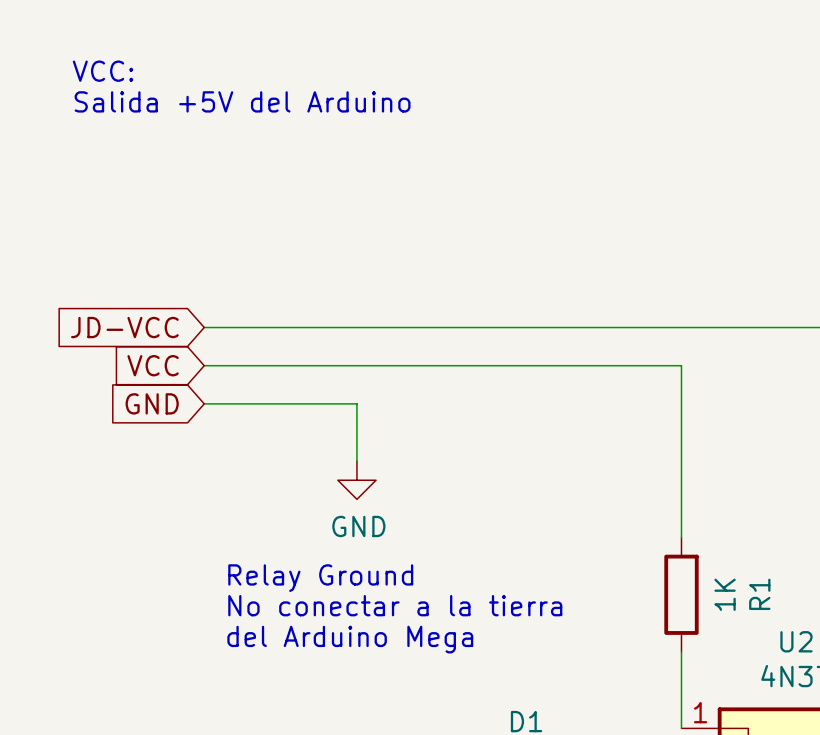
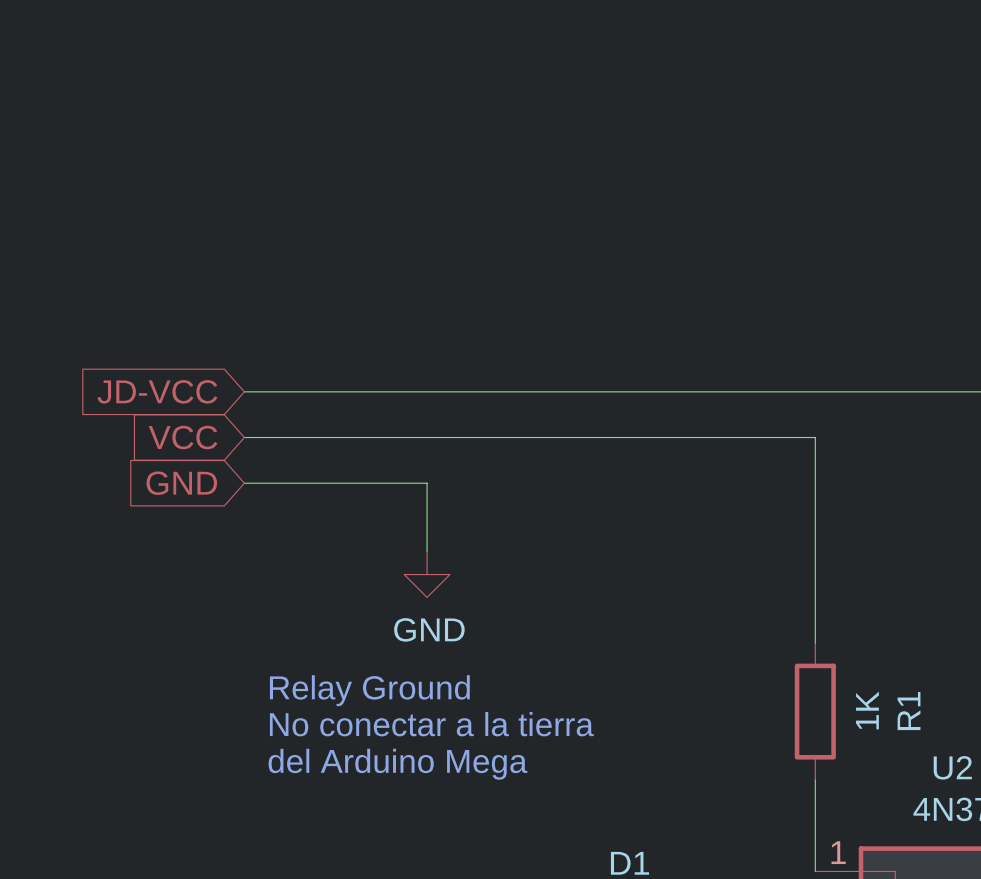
text: VCC: (103, 71) -> none
text: Salida +5V del Arduino (242, 101) -> none

